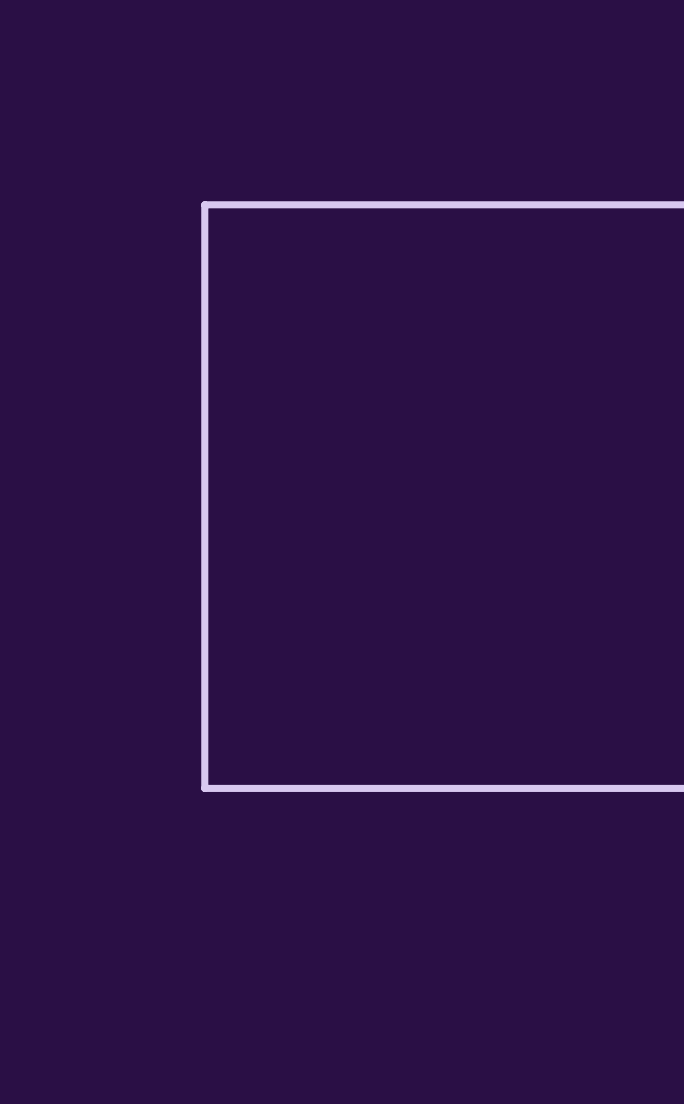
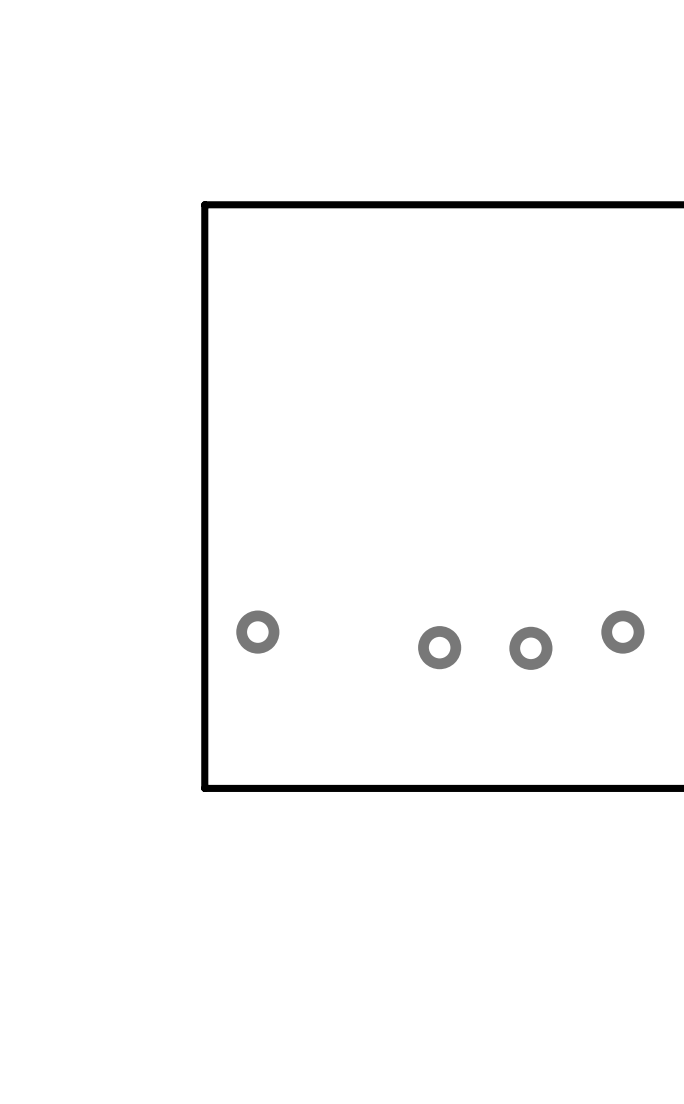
via: none -> (257, 632)
via: none -> (622, 632)
via: none -> (439, 647)
via: none -> (530, 648)

